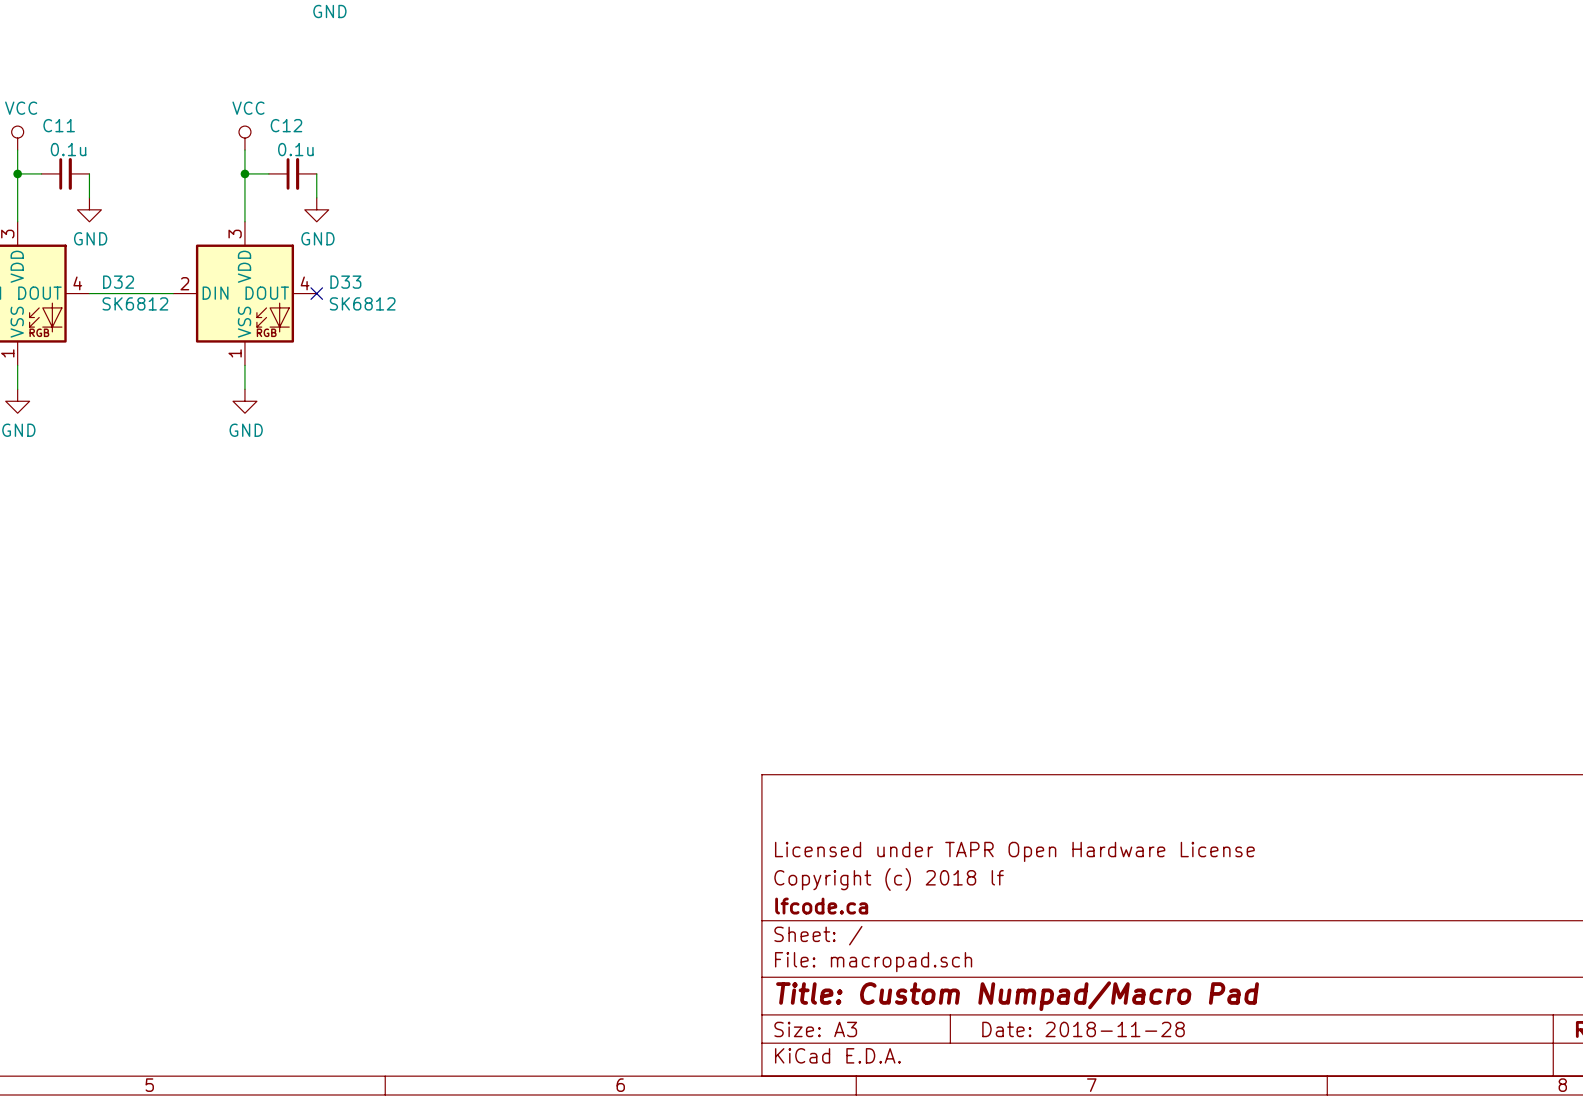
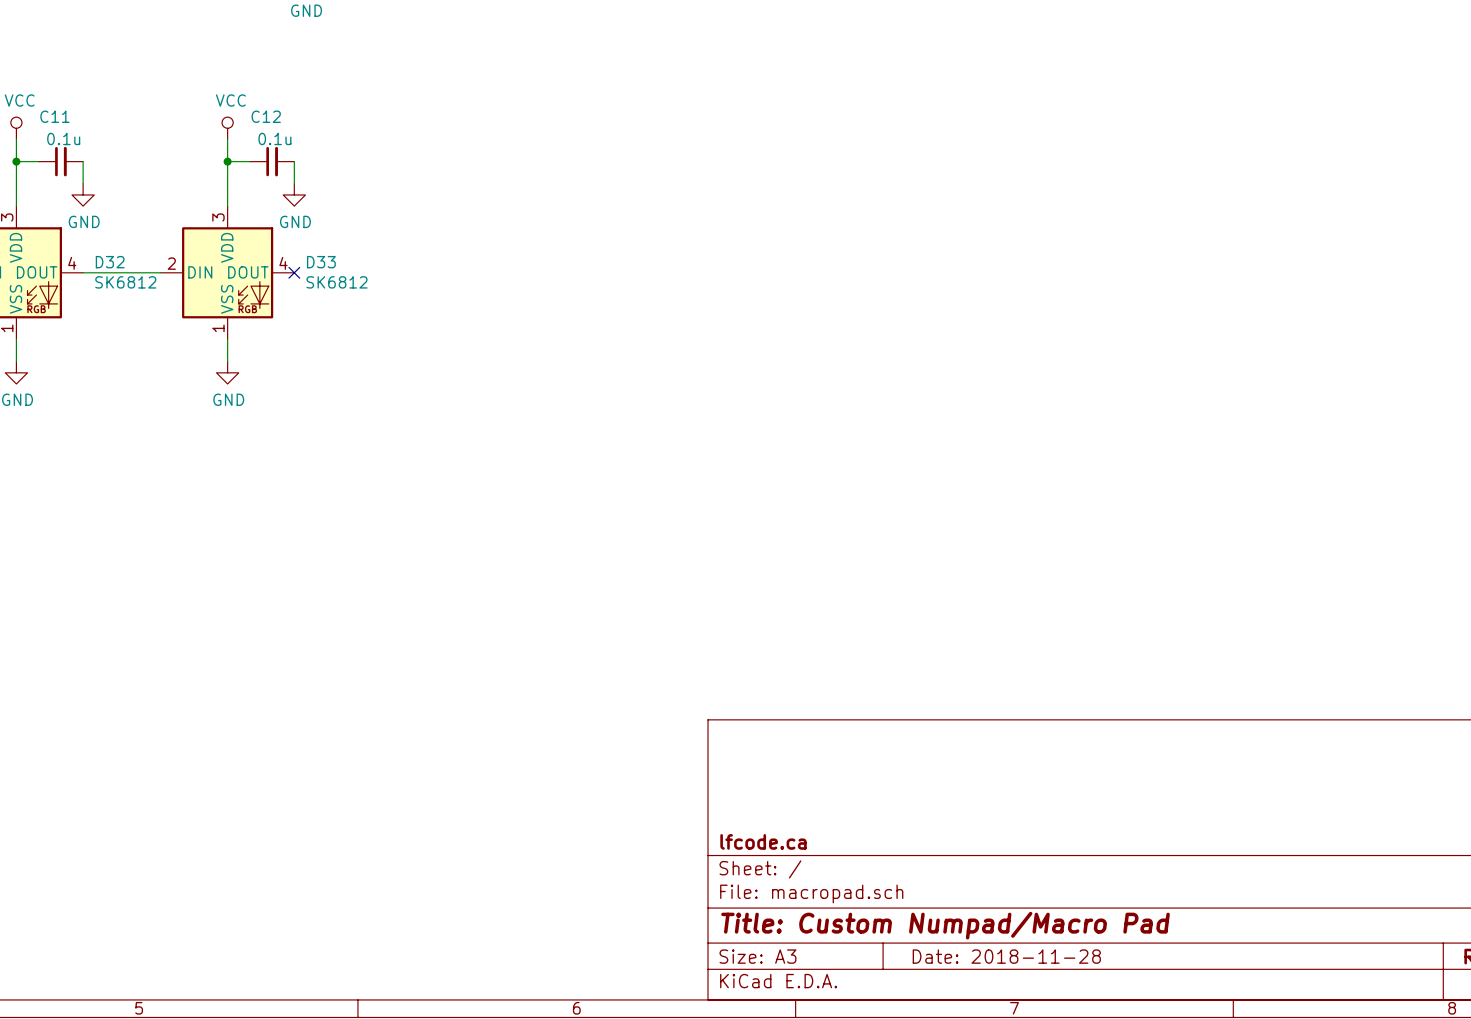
title block: Licensed under TAPR Open Hardware License (1014, 851) -> none
title block: Copyright (c) 2018 lf (889, 879) -> none

